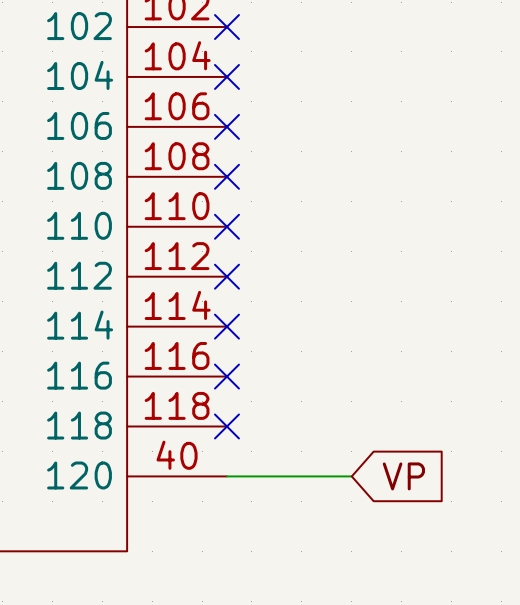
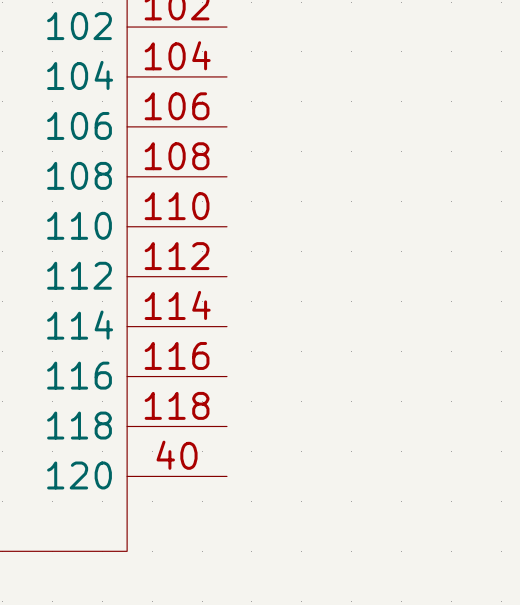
no-connect mark: (226, 27) -> none
no-connect mark: (226, 76) -> none
no-connect mark: (226, 126) -> none
no-connect mark: (226, 176) -> none
no-connect mark: (226, 226) -> none
no-connect mark: (226, 276) -> none
no-connect mark: (226, 326) -> none
no-connect mark: (226, 376) -> none
no-connect mark: (226, 426) -> none
wire: (226, 476) (351, 476) -> none
global label: VP (403, 476) -> none

